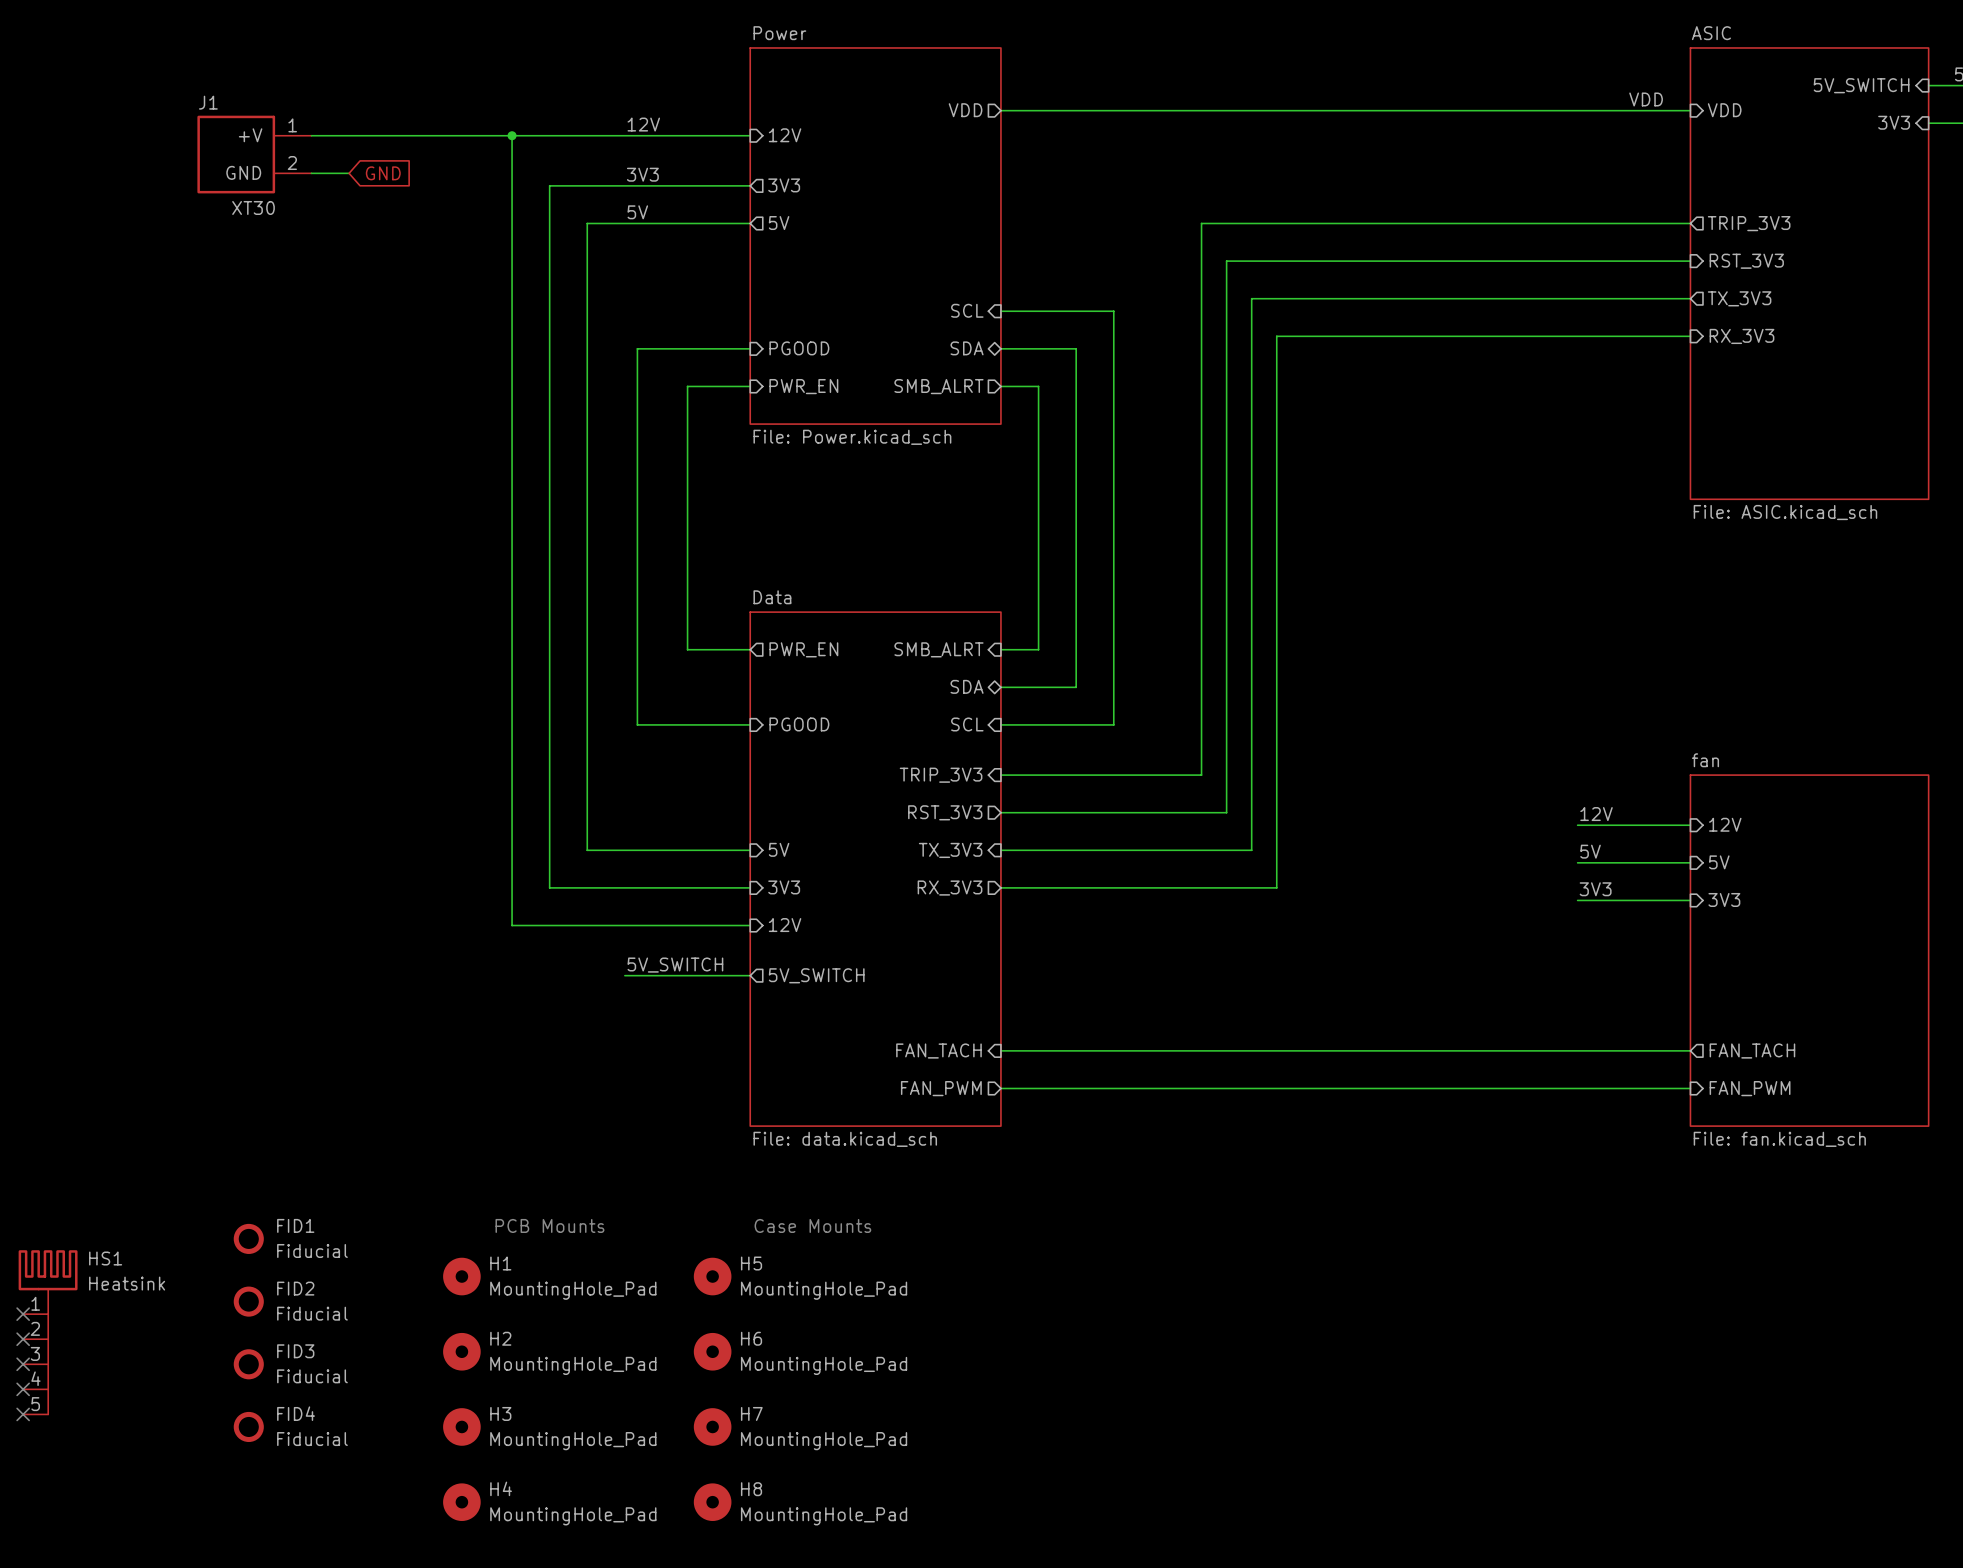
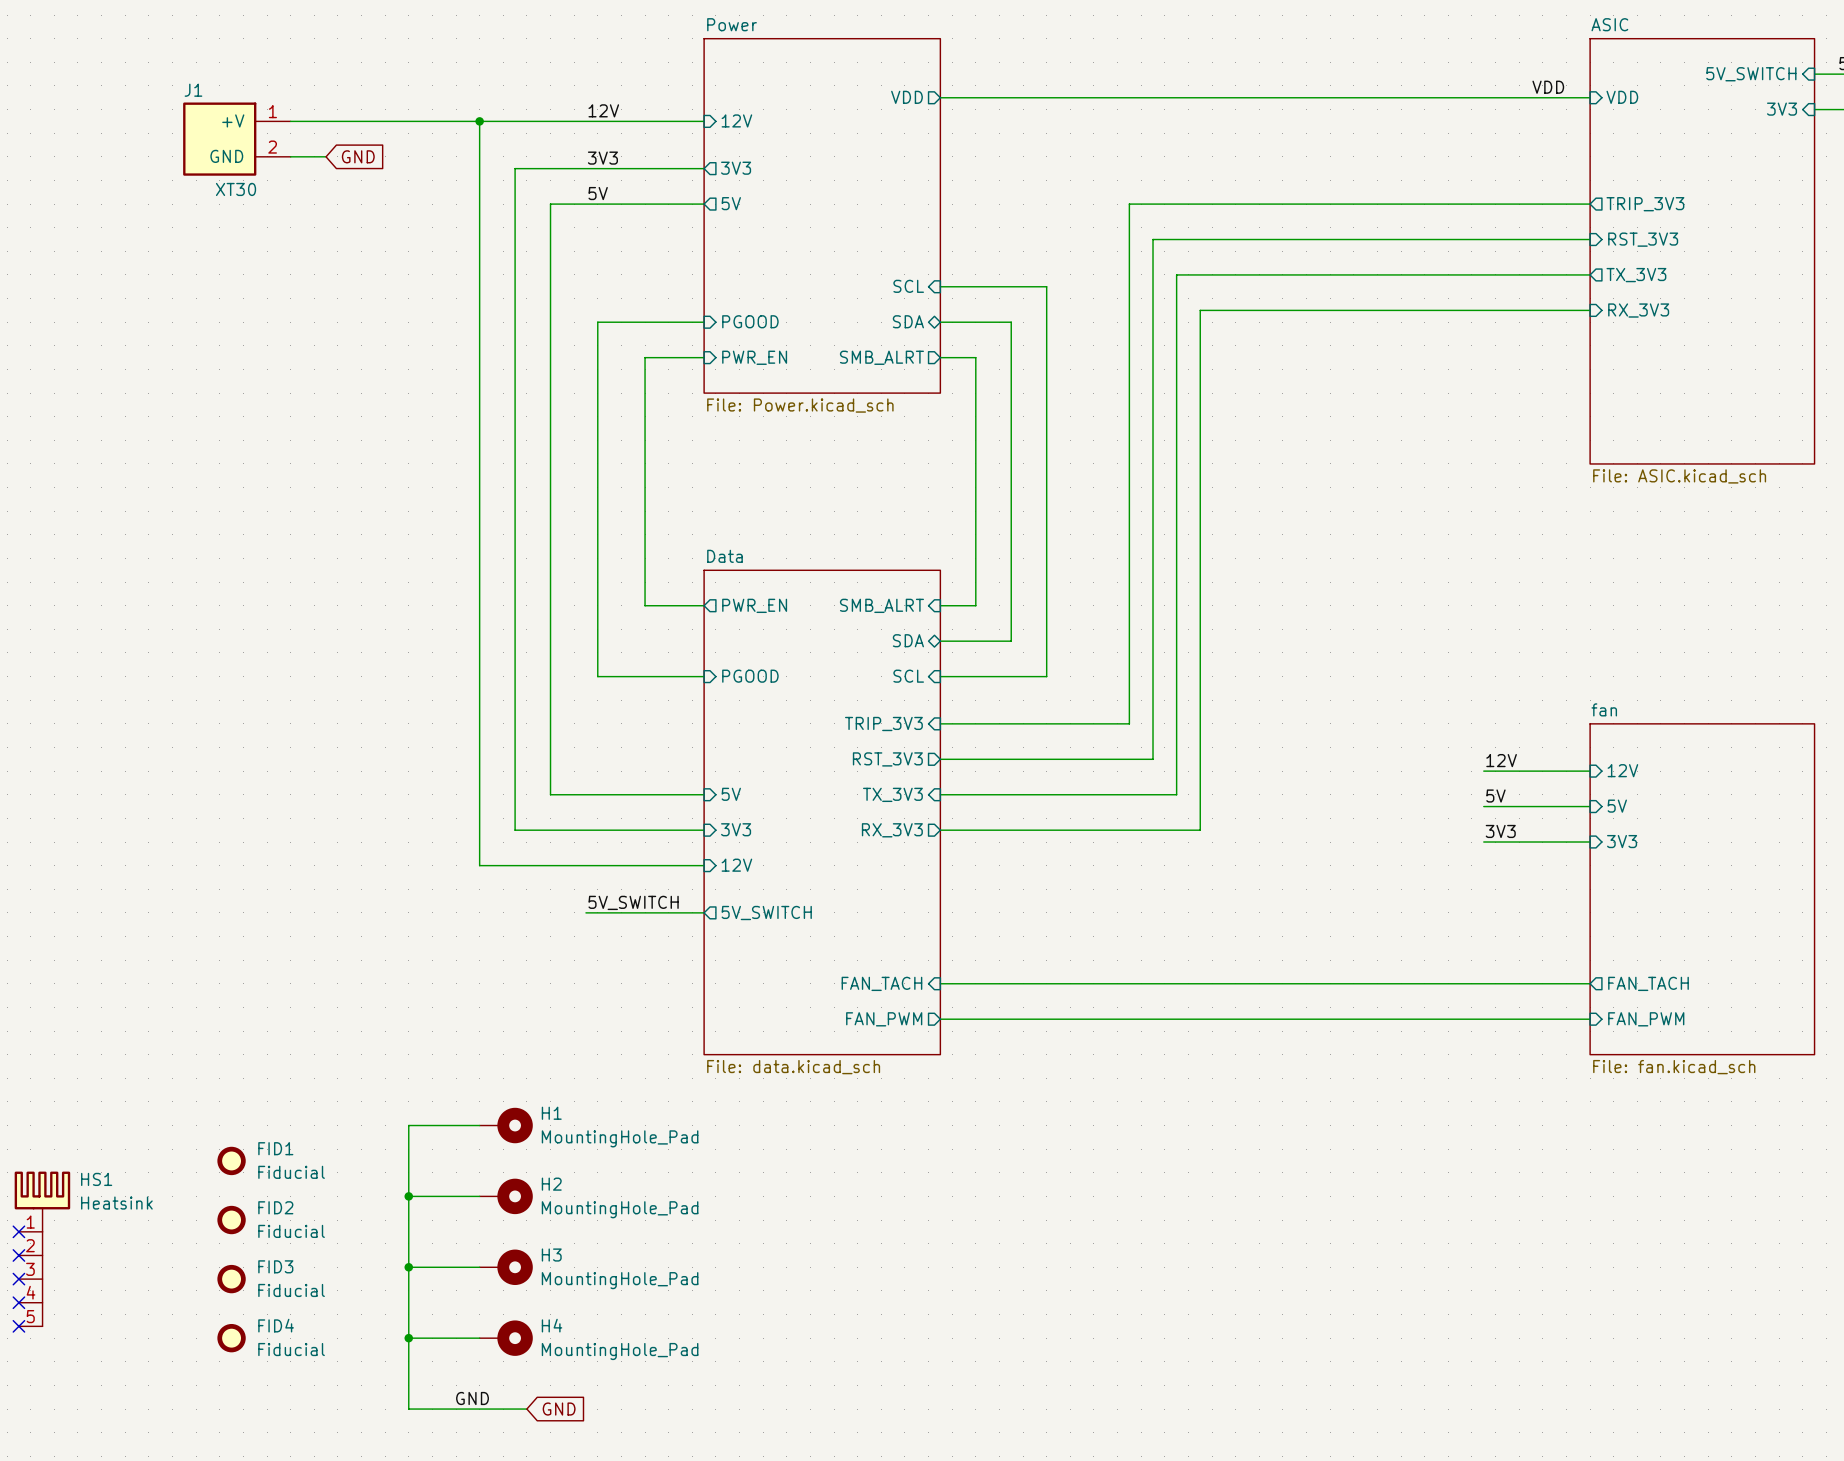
wire: none -> (479, 1125) (408, 1125) (408, 1409) (526, 1409)
text: PCB Mounts (549, 1225) -> none
text: Case Mounts (812, 1225) -> none
H1 symbol: [443, 1257, 481, 1296] -> [479, 1107, 533, 1144]
wire: none -> (408, 1196) (479, 1196)
junction: none -> (408, 1196)
H5: MountingHole_Pad (712, 1276) -> none
H2 symbol: [443, 1332, 481, 1371] -> [479, 1178, 533, 1215]
wire: none -> (408, 1267) (479, 1267)
junction: none -> (408, 1267)
H6: MountingHole_Pad (712, 1351) -> none
H3 symbol: [443, 1408, 481, 1446] -> [479, 1249, 533, 1286]
wire: none -> (408, 1338) (479, 1338)
junction: none -> (408, 1338)
H7: MountingHole_Pad (712, 1426) -> none
H4 symbol: [443, 1483, 481, 1521] -> [479, 1320, 533, 1356]
label: none -> GND (472, 1398)
global label: none -> GND (559, 1409)
H8: MountingHole_Pad (712, 1502) -> none

